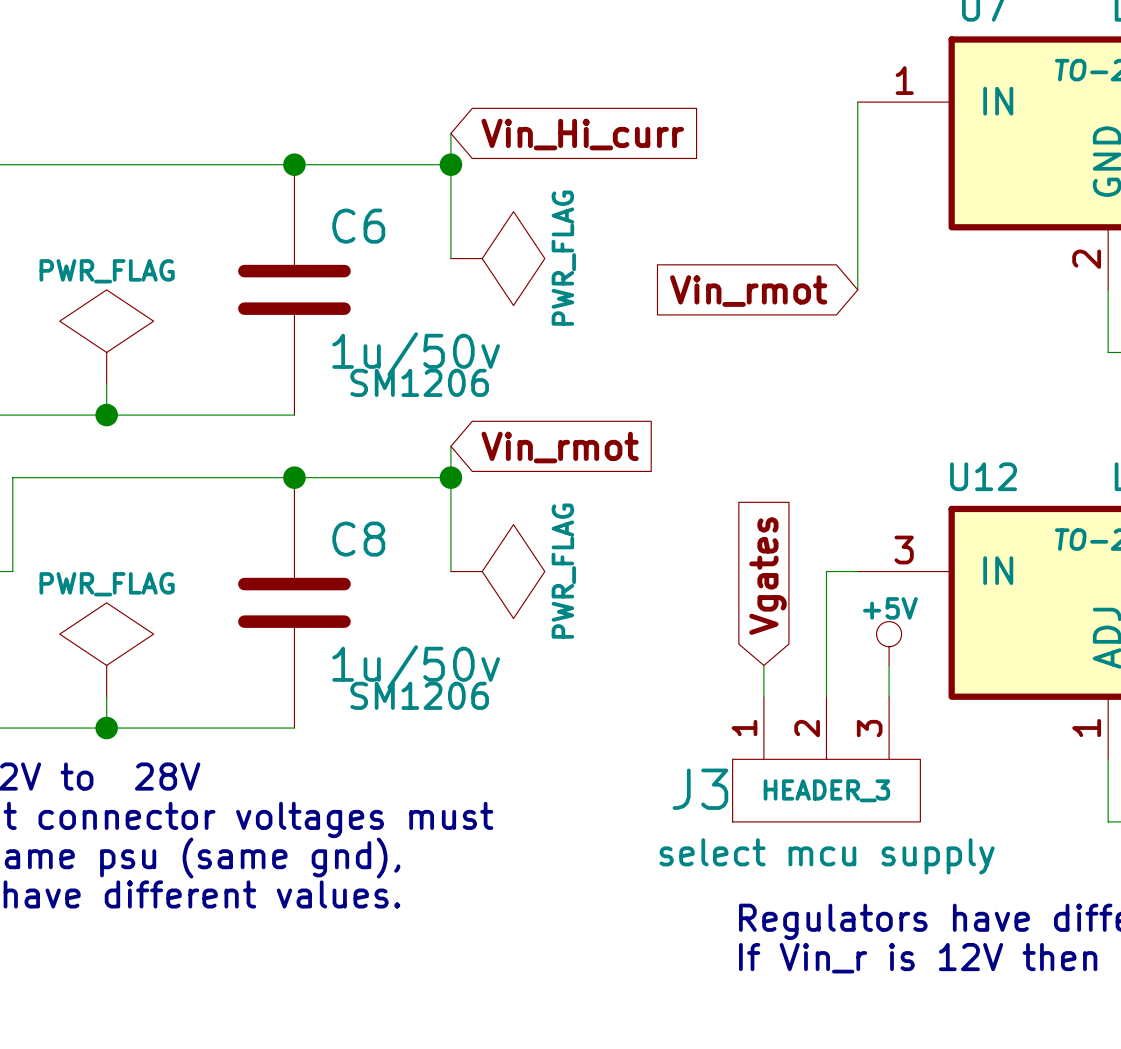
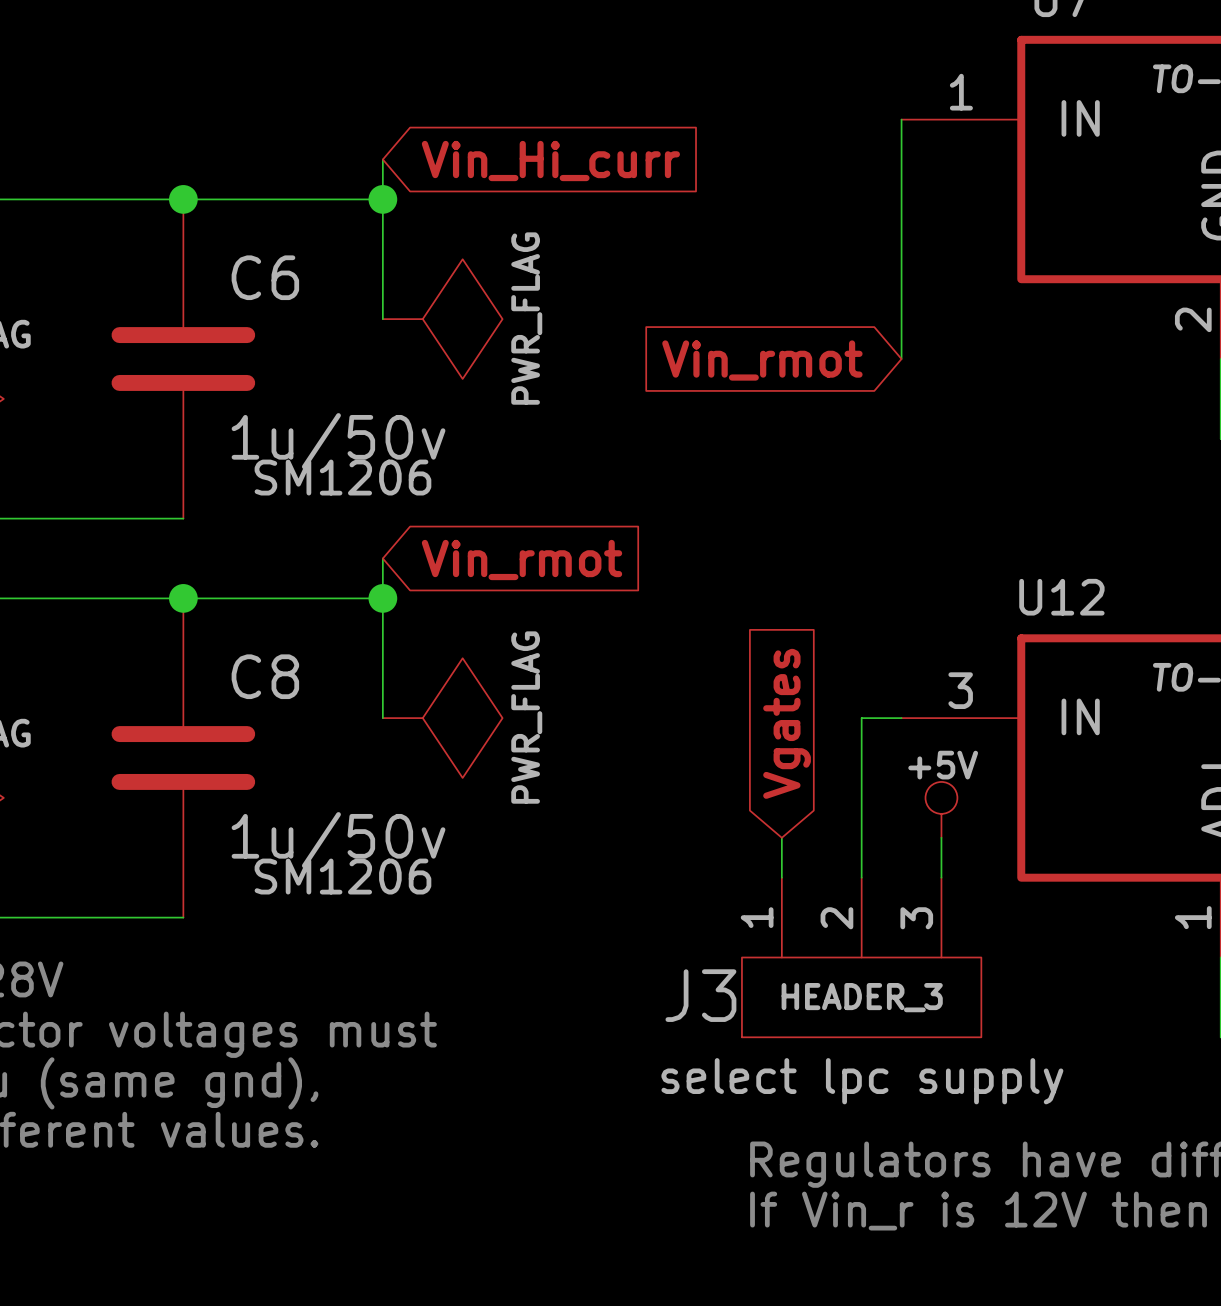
J3 text: select mcu supply (827, 856) -> select lpc supply (862, 1081)

